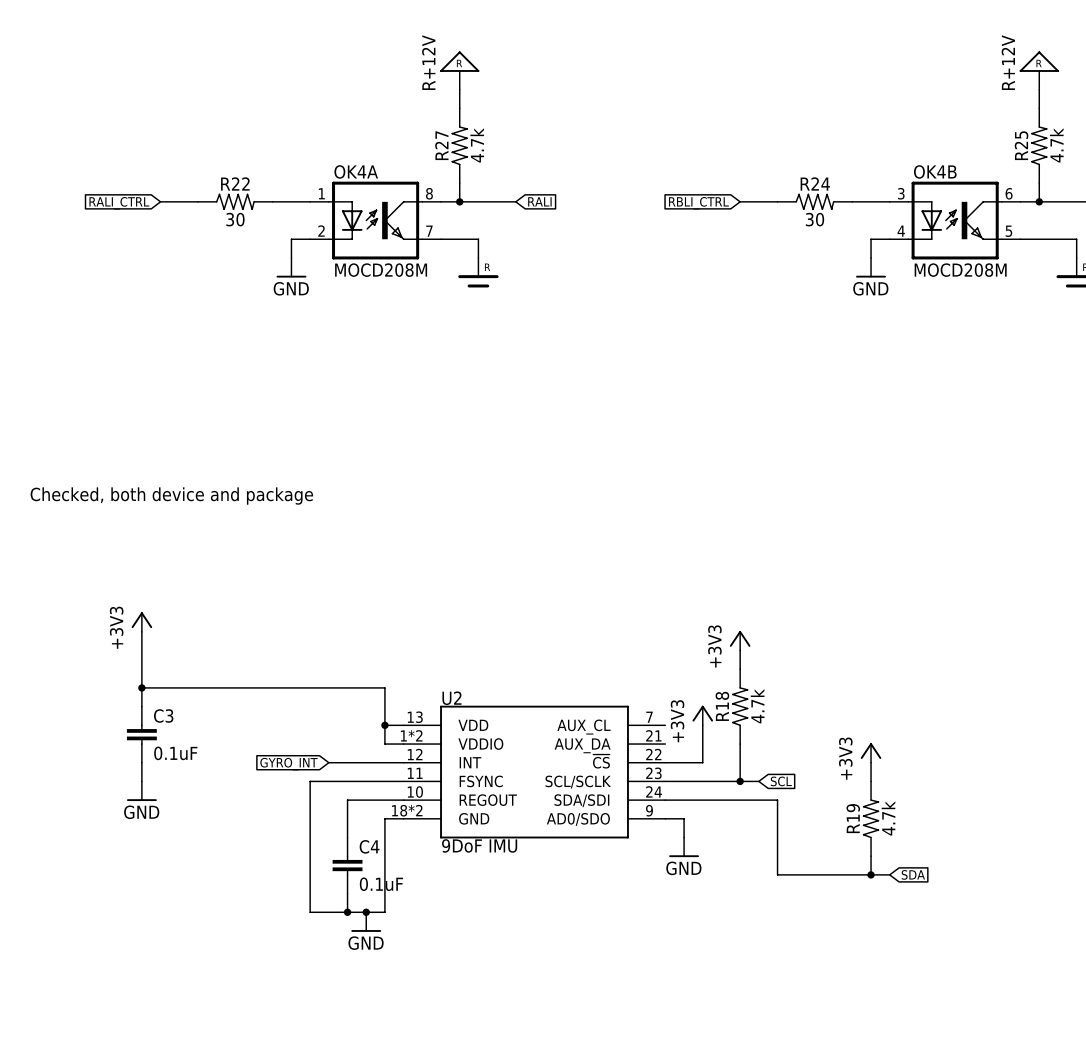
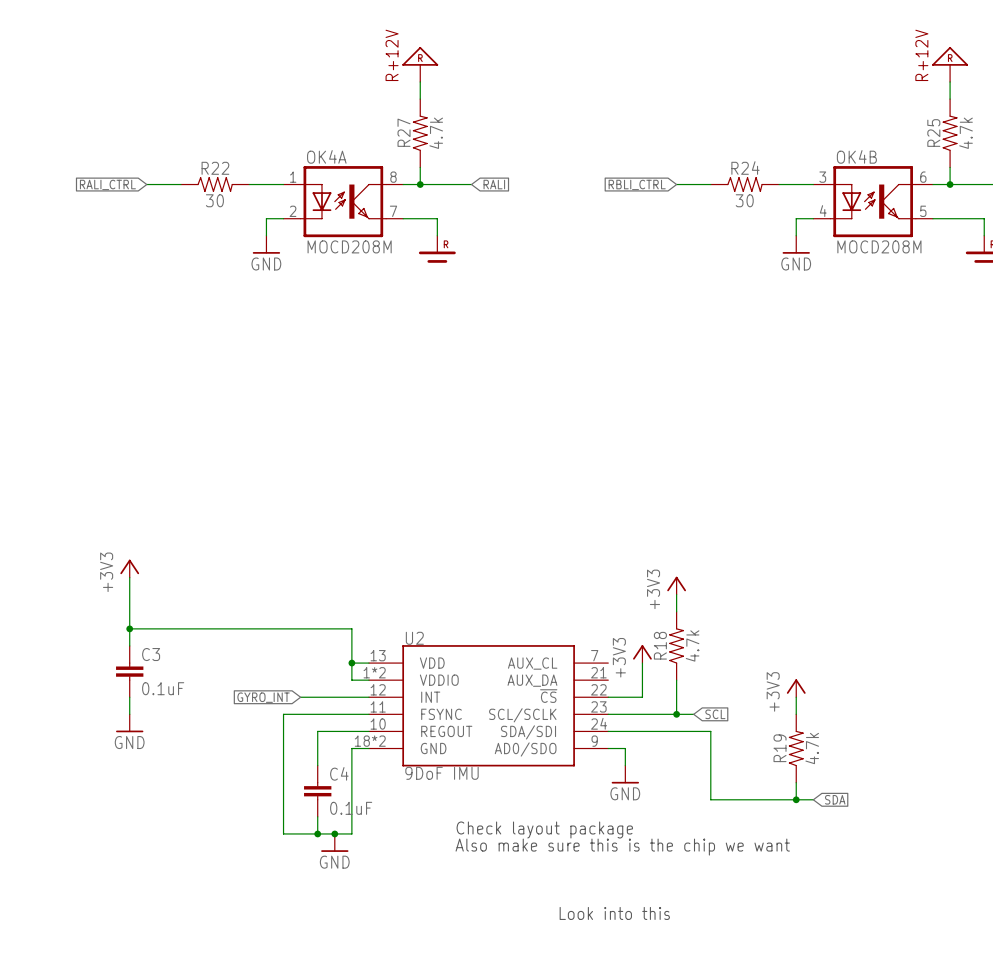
text: Checked, both device and package (171, 496) -> none
text: none -> Check layout package (544, 829)
text: none -> Also make sure this is the chip we want (622, 847)
text: none -> Look into this (614, 913)

